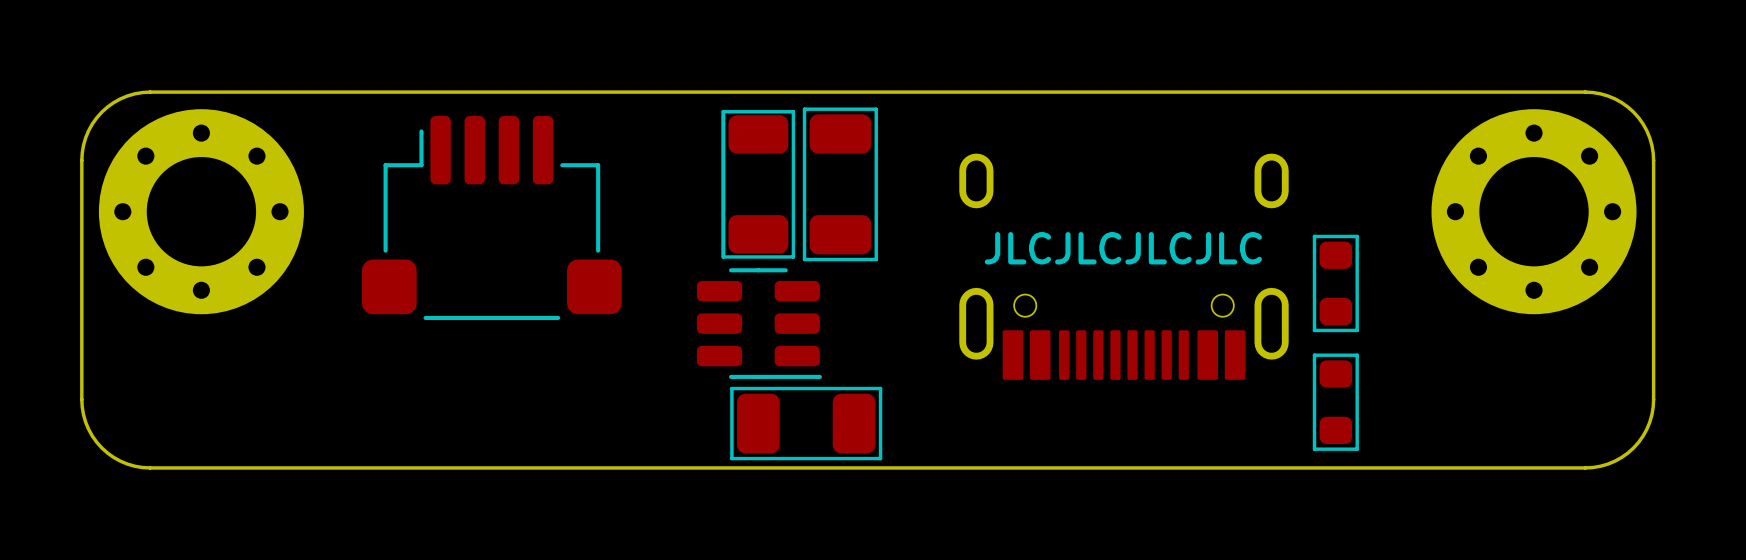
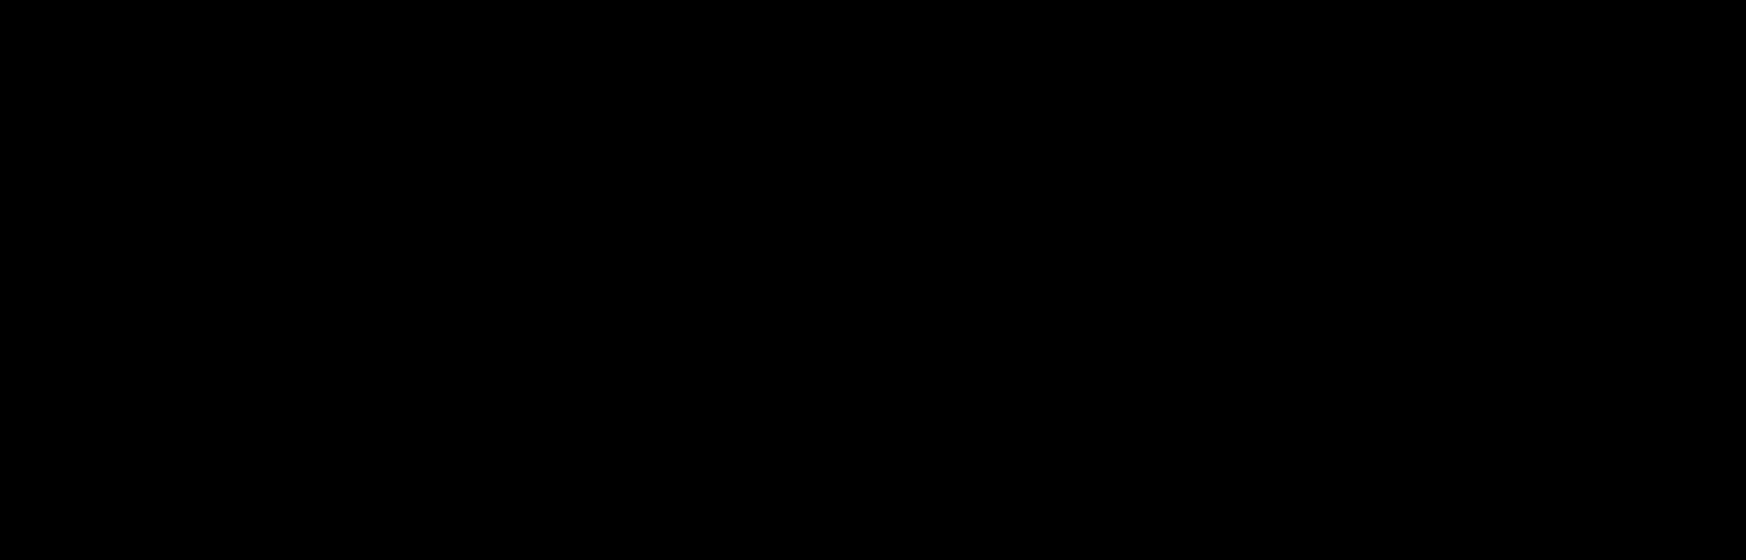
board edge: (150, 92) (1585, 92) (1600, 93) (1621, 102) (1638, 117) (1649, 137) (1653, 152) (1653, 399) (1651, 414) (1643, 435) (1627, 453) (1607, 464) (1585, 467) (150, 467) (134, 466) (113, 457) (101, 447) (88, 429) (83, 414) (81, 399) (81, 160) (85, 137) (92, 124) (101, 112) (113, 102) (127, 95) (150, 92) -> none
part: (758, 184) -> none
part: (840, 184) -> none
part: (201, 211) -> none
part: (1534, 211) -> none
part: (491, 218) -> none
drawing: [984, 232, 1262, 265] -> none
part: (1123, 266) -> none
part: (1335, 283) -> none
part: (759, 323) -> none
part: (1335, 402) -> none
part: (806, 423) -> none

